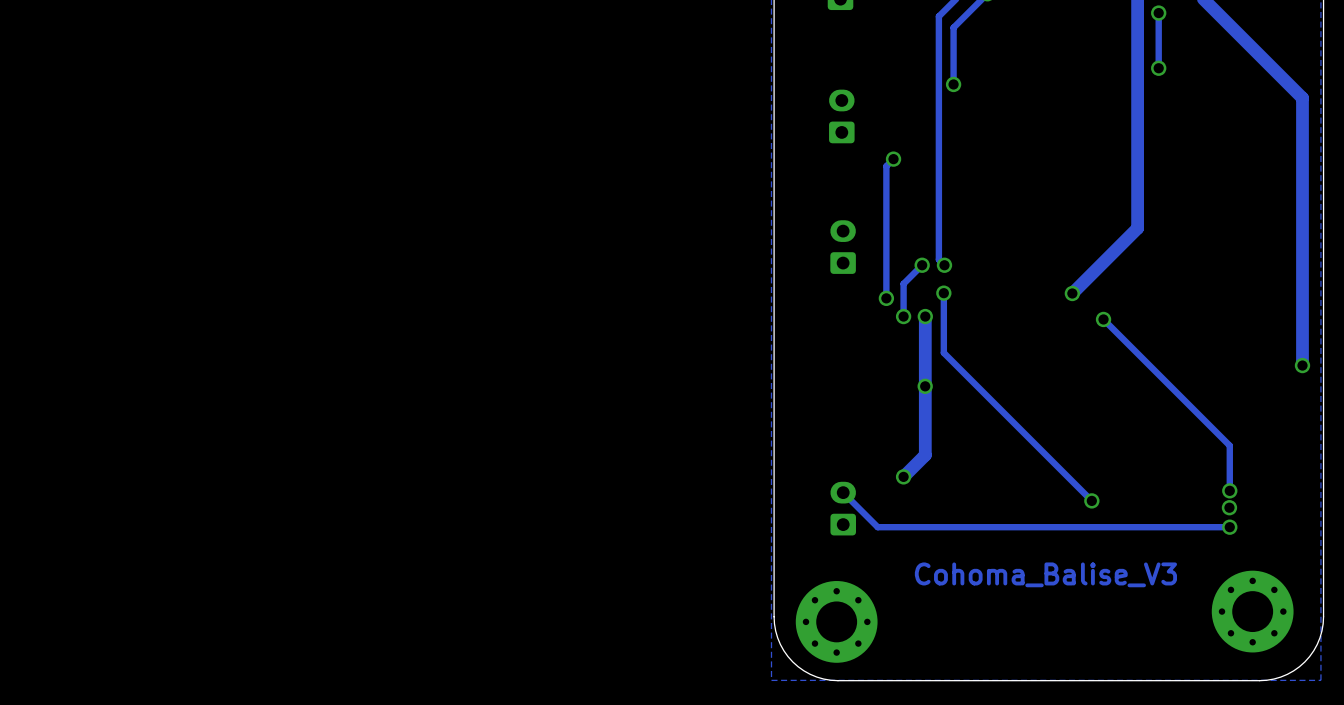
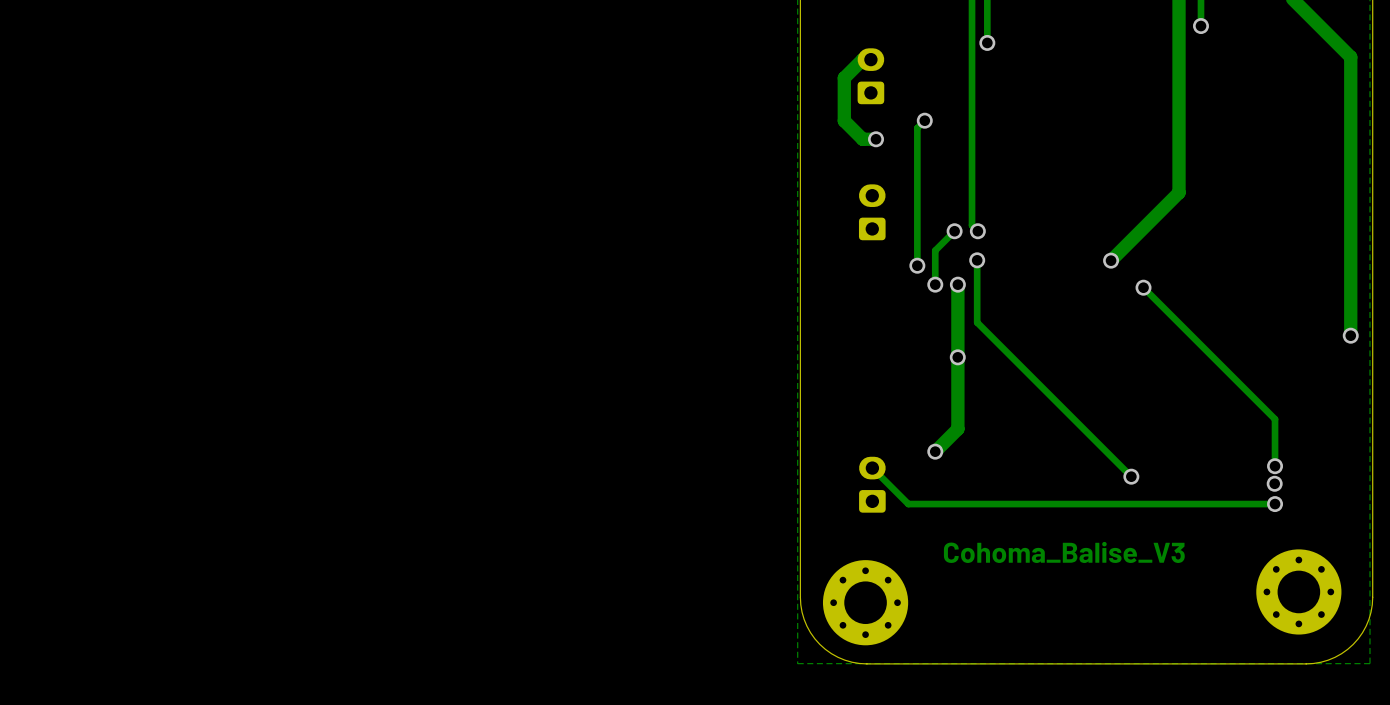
track: none -> (870, 59) (862, 59) (844, 78) (844, 120) (862, 139) (876, 139)
via: none -> (876, 139)

